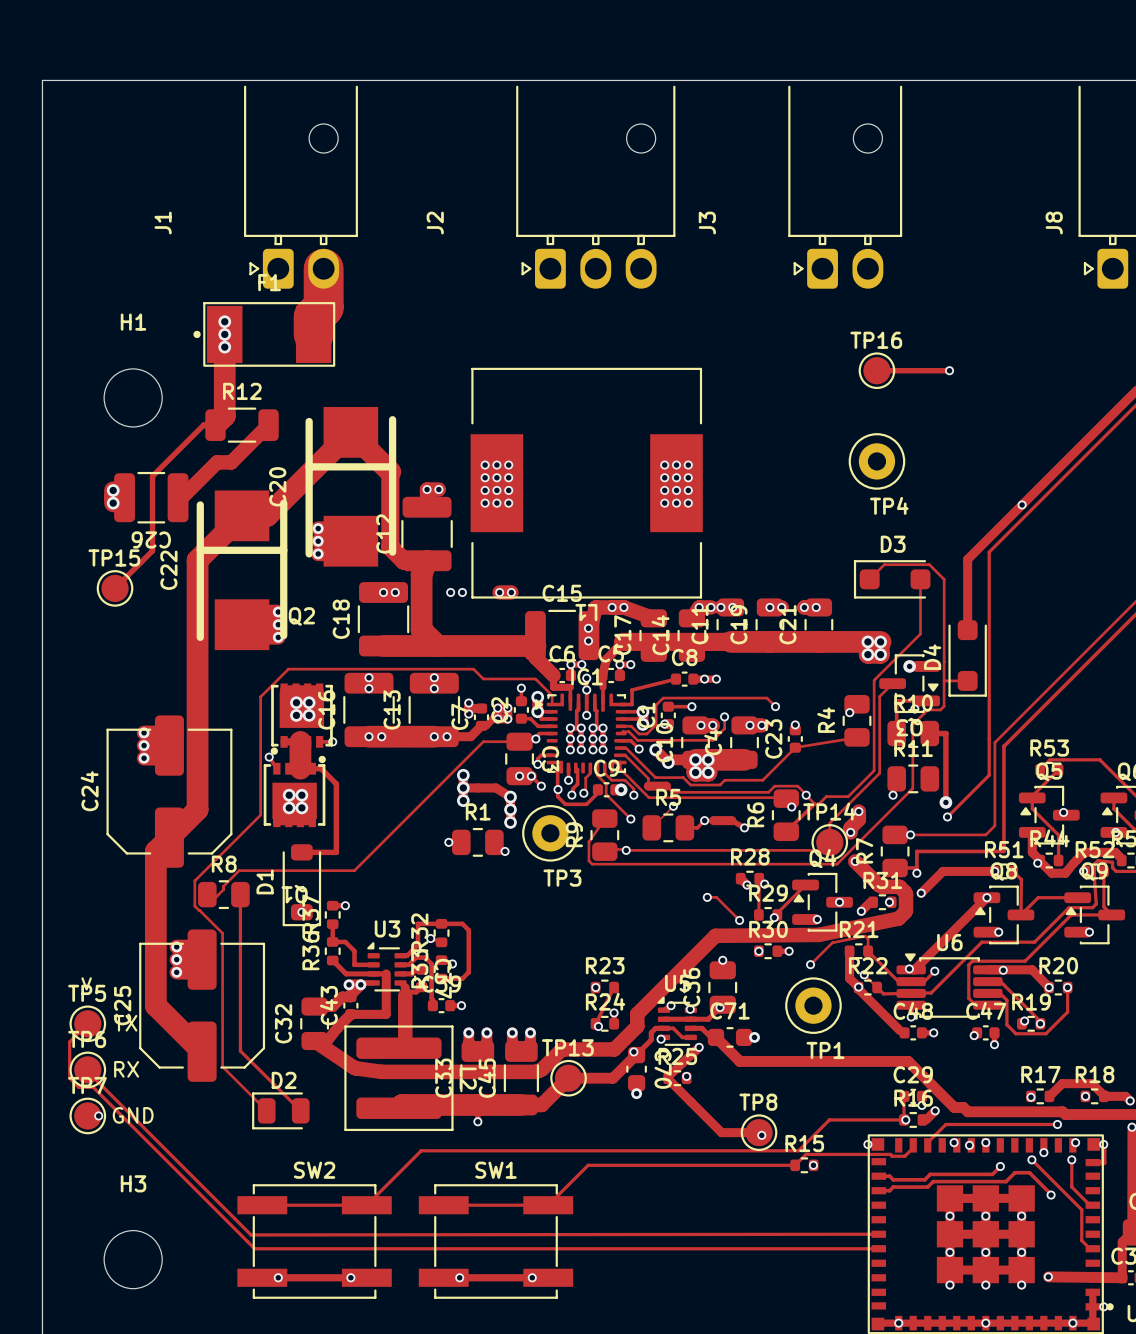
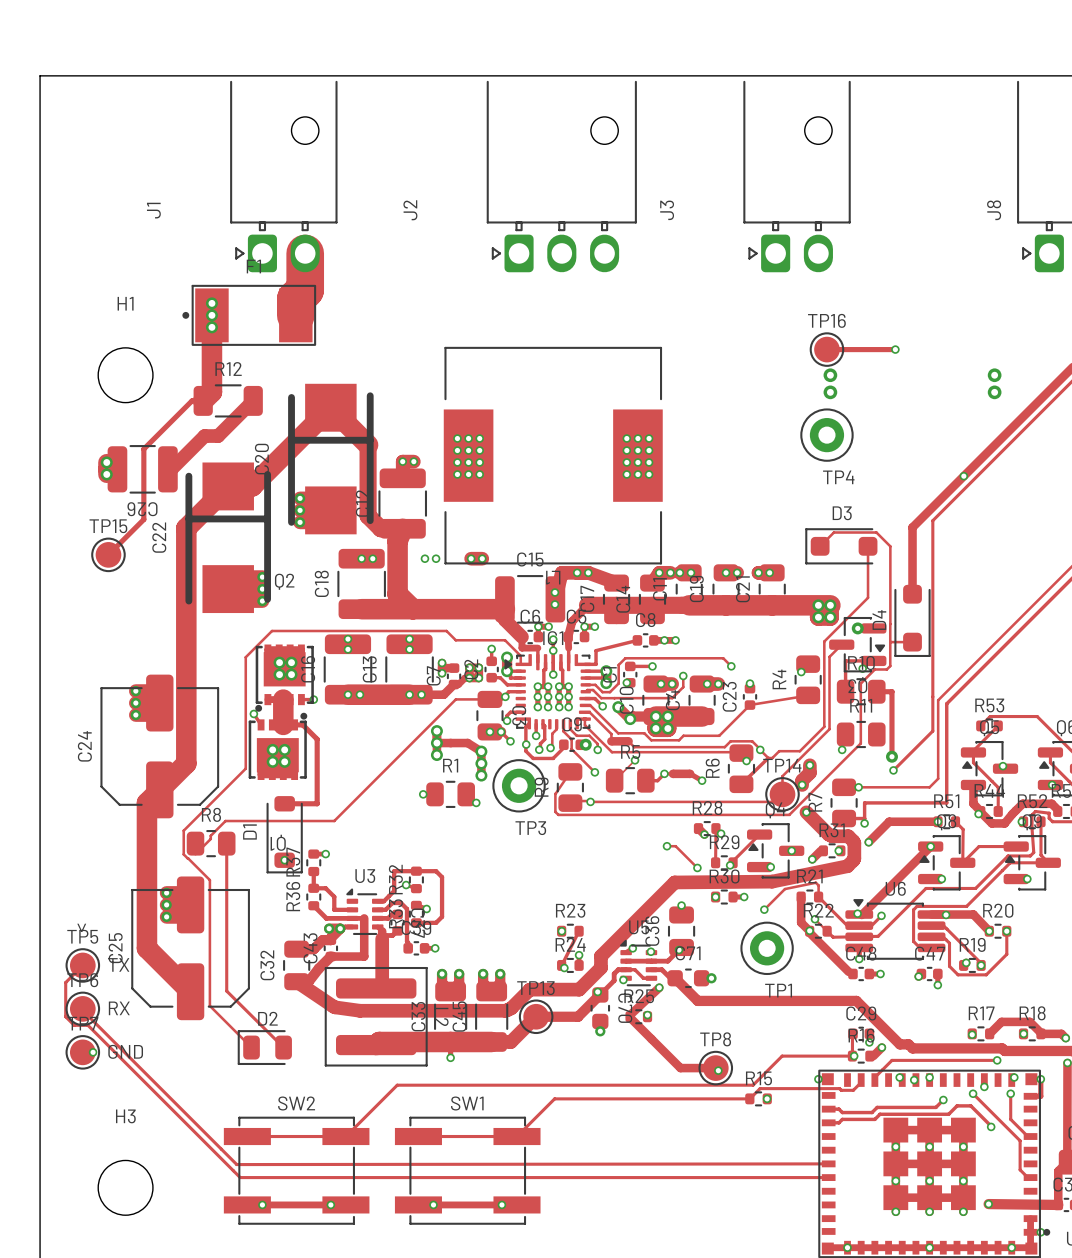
via: none -> (830, 375)
via: none -> (994, 375)
via: none -> (830, 392)
via: none -> (994, 392)

